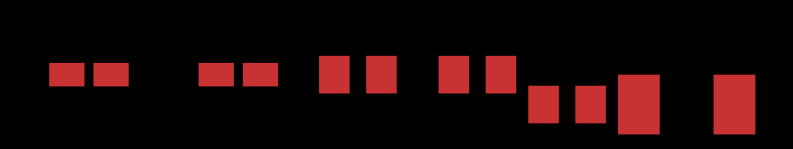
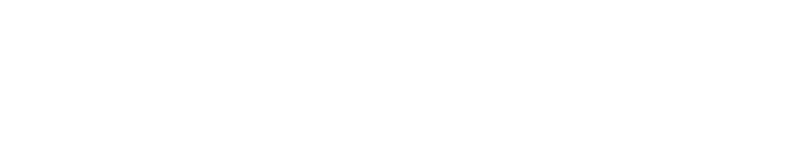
part: (88, 74) -> none
part: (238, 74) -> none
part: (357, 74) -> none
part: (477, 74) -> none
part: (567, 104) -> none
part: (686, 104) -> none

